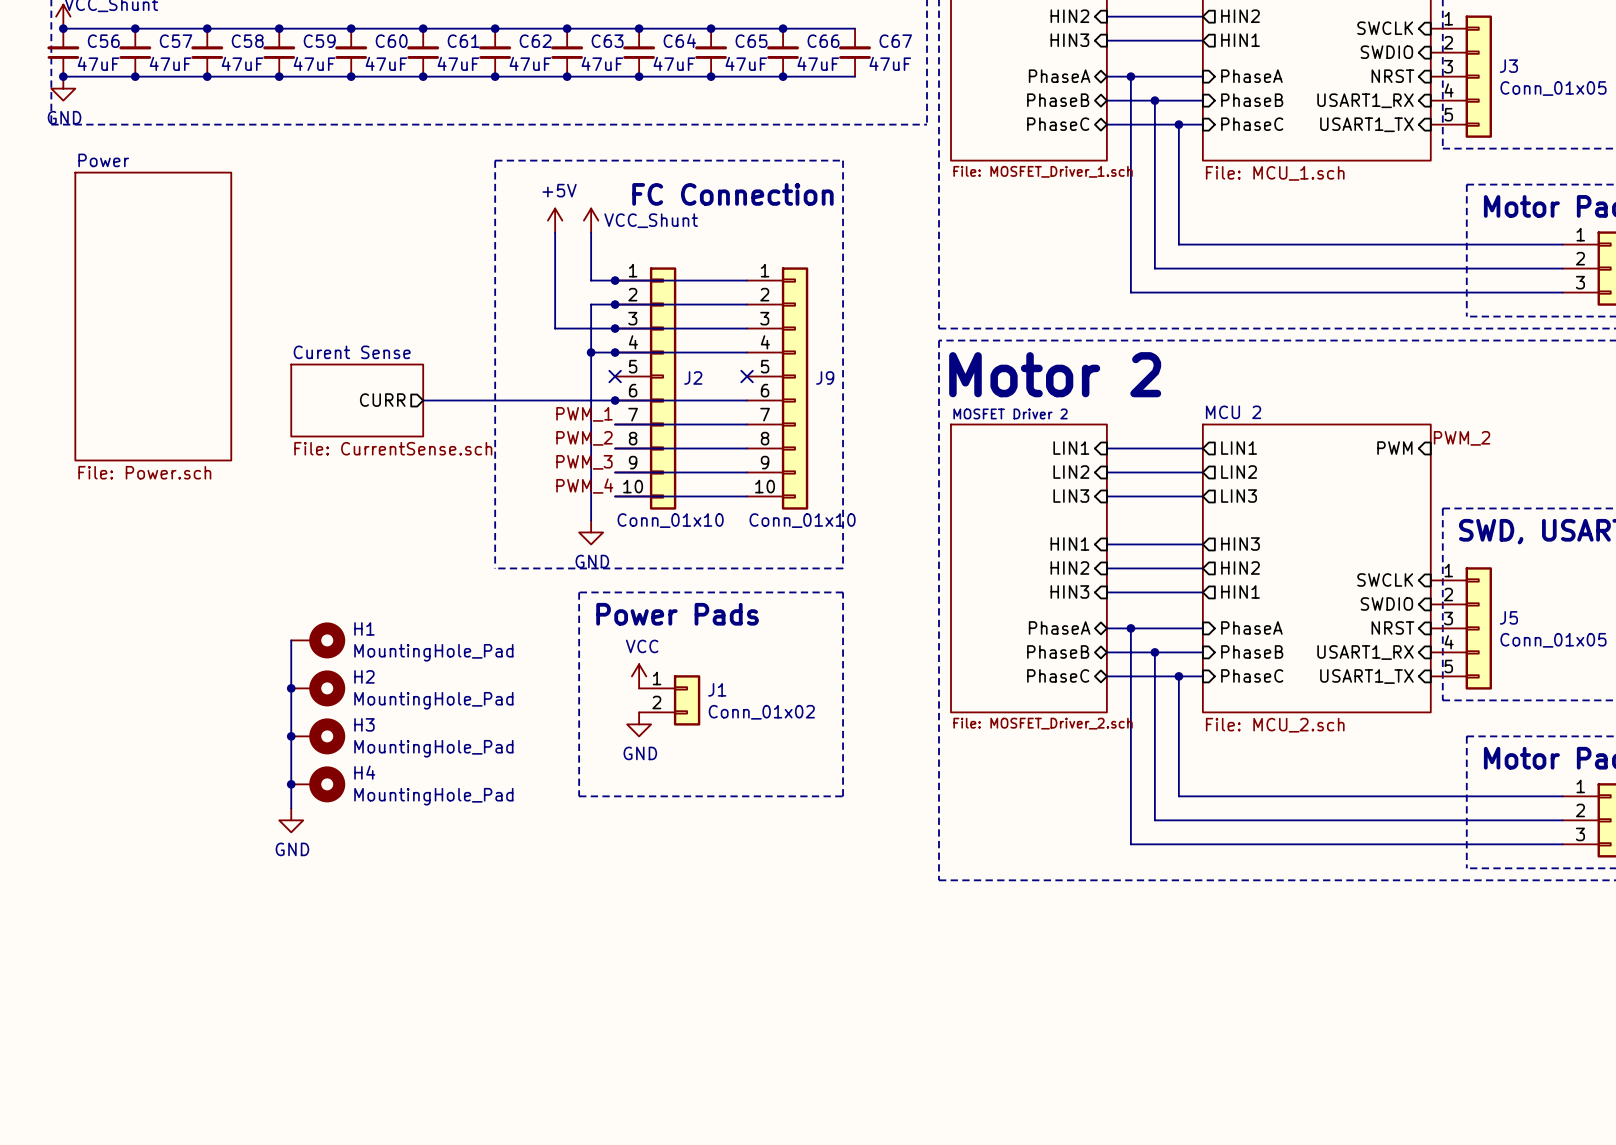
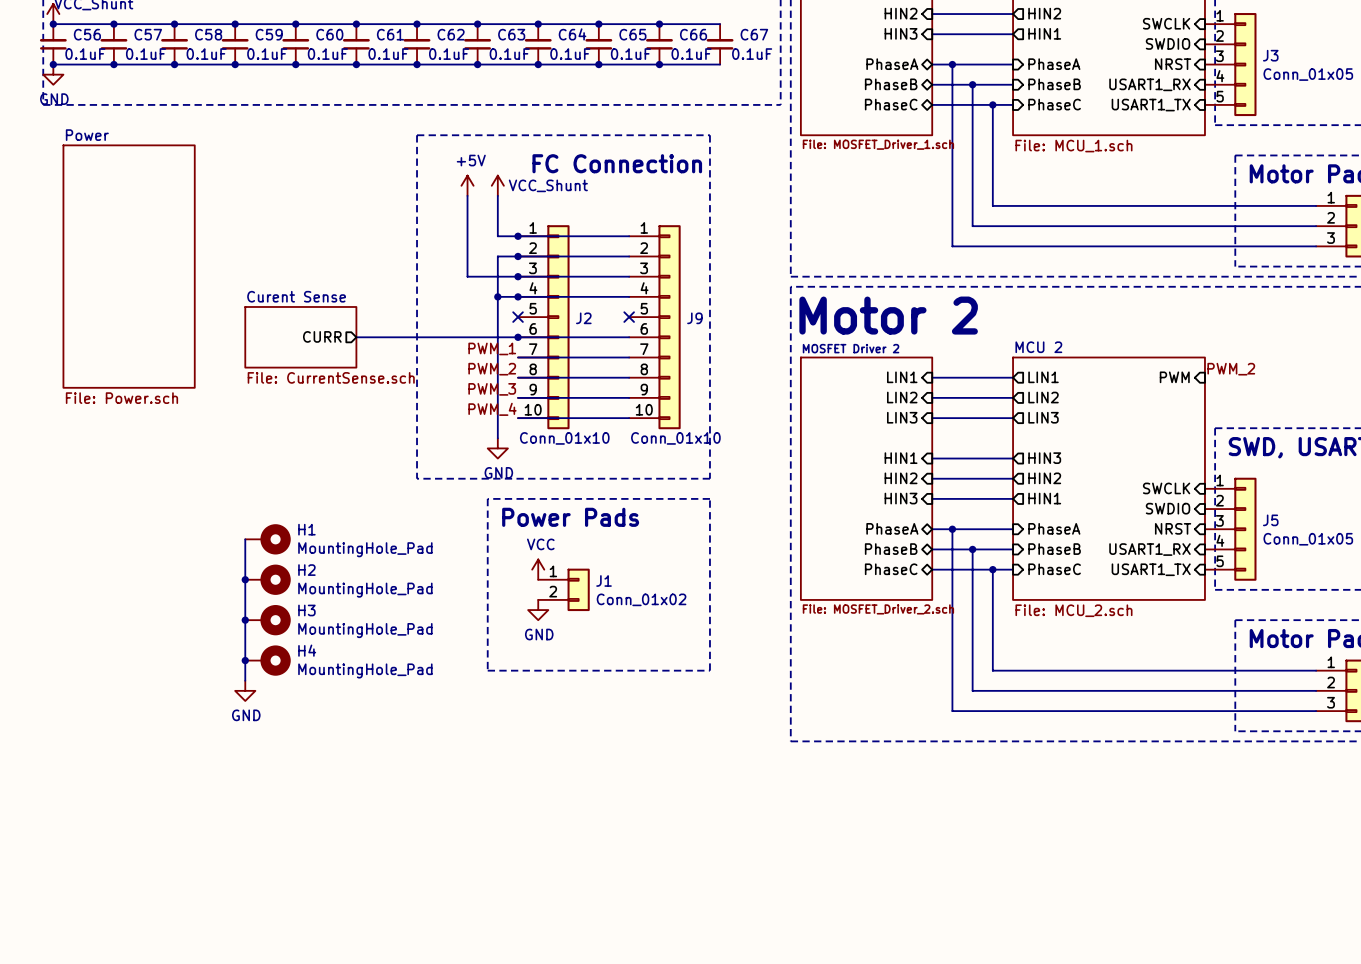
C56 value: 47uF (98, 63) -> 0.1uF (85, 54)
C57 value: 47uF (170, 63) -> 0.1uF (146, 54)
C58 value: 47uF (242, 63) -> 0.1uF (206, 54)
C59 value: 47uF (314, 63) -> 0.1uF (267, 54)
C60 value: 47uF (386, 63) -> 0.1uF (327, 54)
C61 value: 47uF (458, 63) -> 0.1uF (388, 54)
C62 value: 47uF (530, 63) -> 0.1uF (449, 54)
C63 value: 47uF (602, 63) -> 0.1uF (509, 54)
C64 value: 47uF (674, 63) -> 0.1uF (570, 54)
C65 value: 47uF (746, 63) -> 0.1uF (630, 54)
C66 value: 47uF (818, 63) -> 0.1uF (691, 54)
C67 value: 47uF (890, 63) -> 0.1uF (752, 54)

